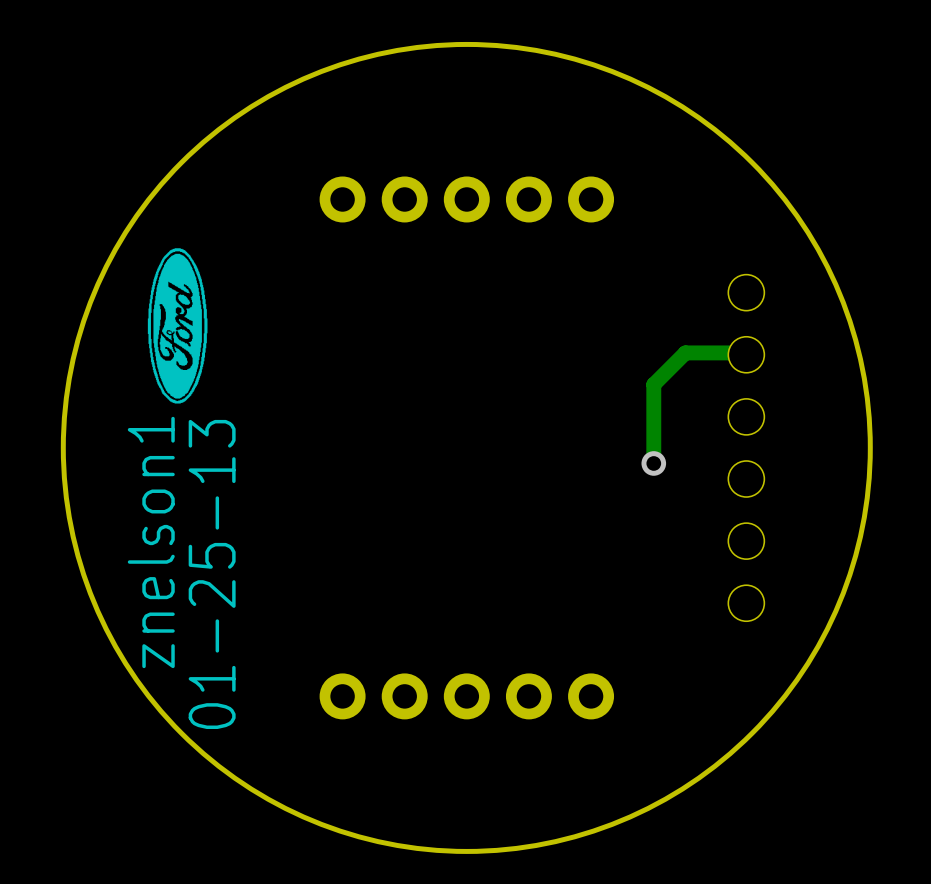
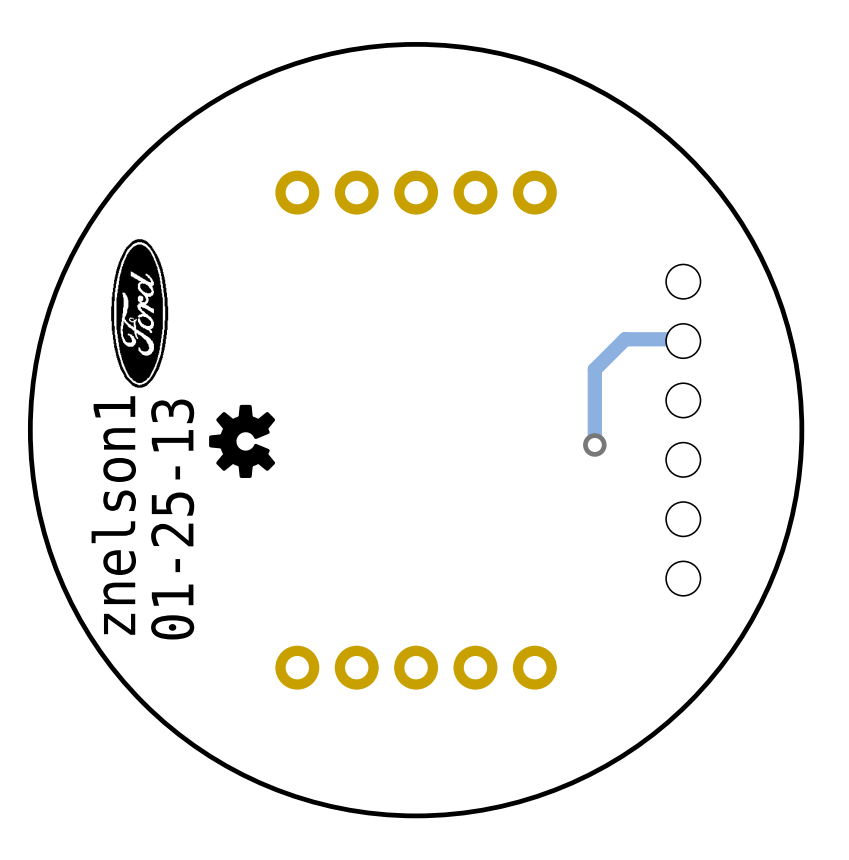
drawing: none -> [209, 404, 276, 478]

